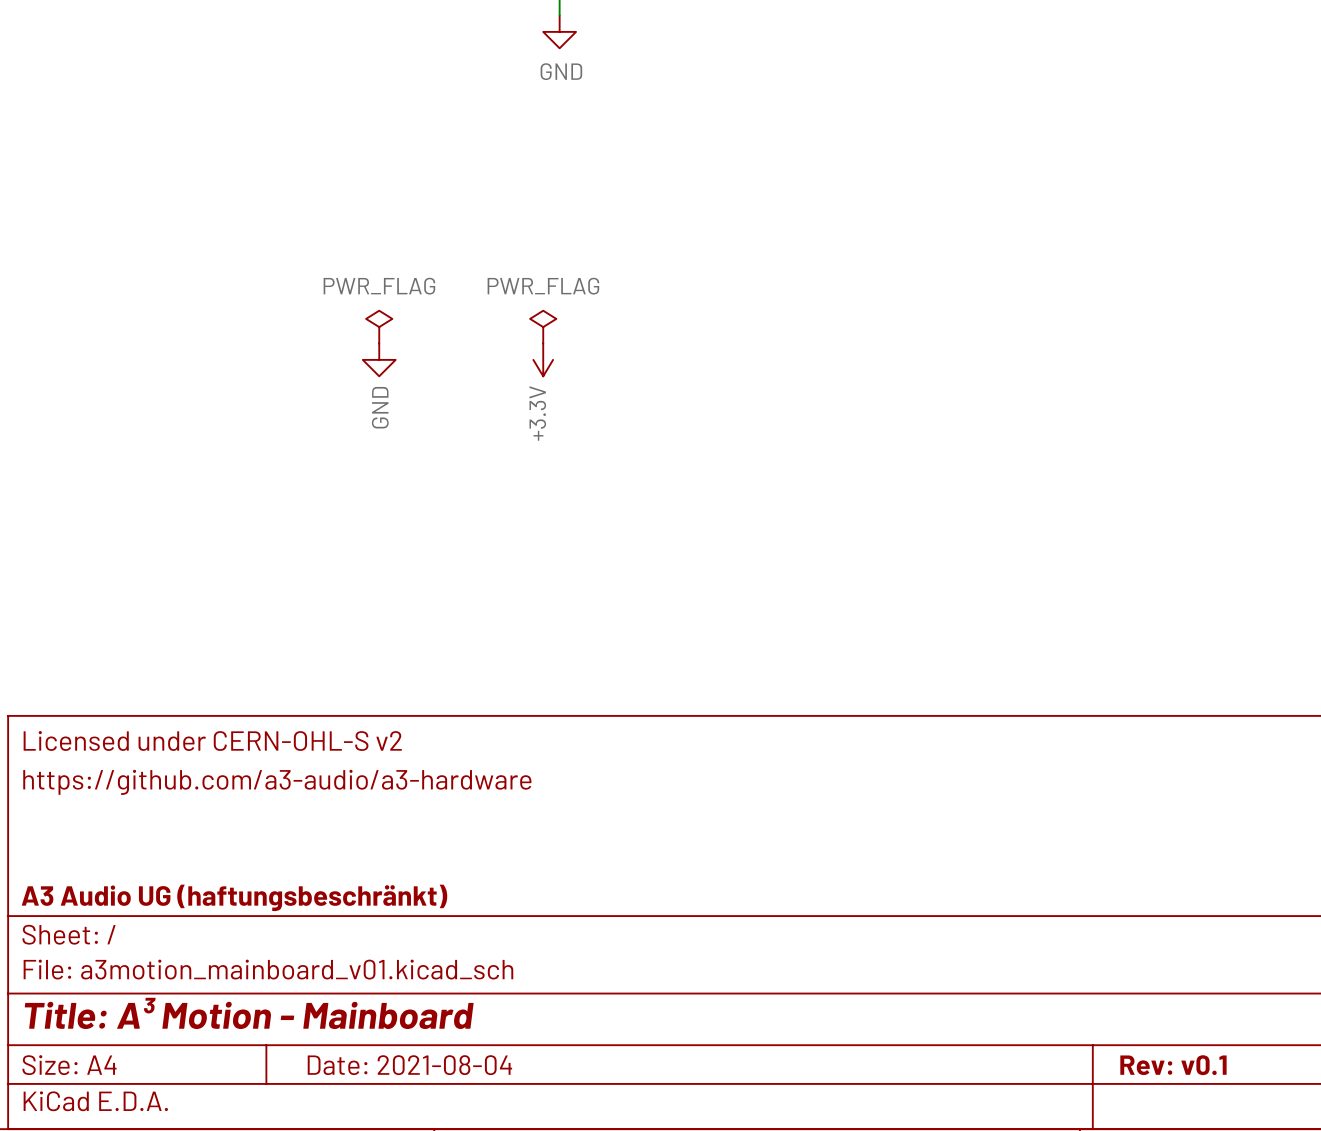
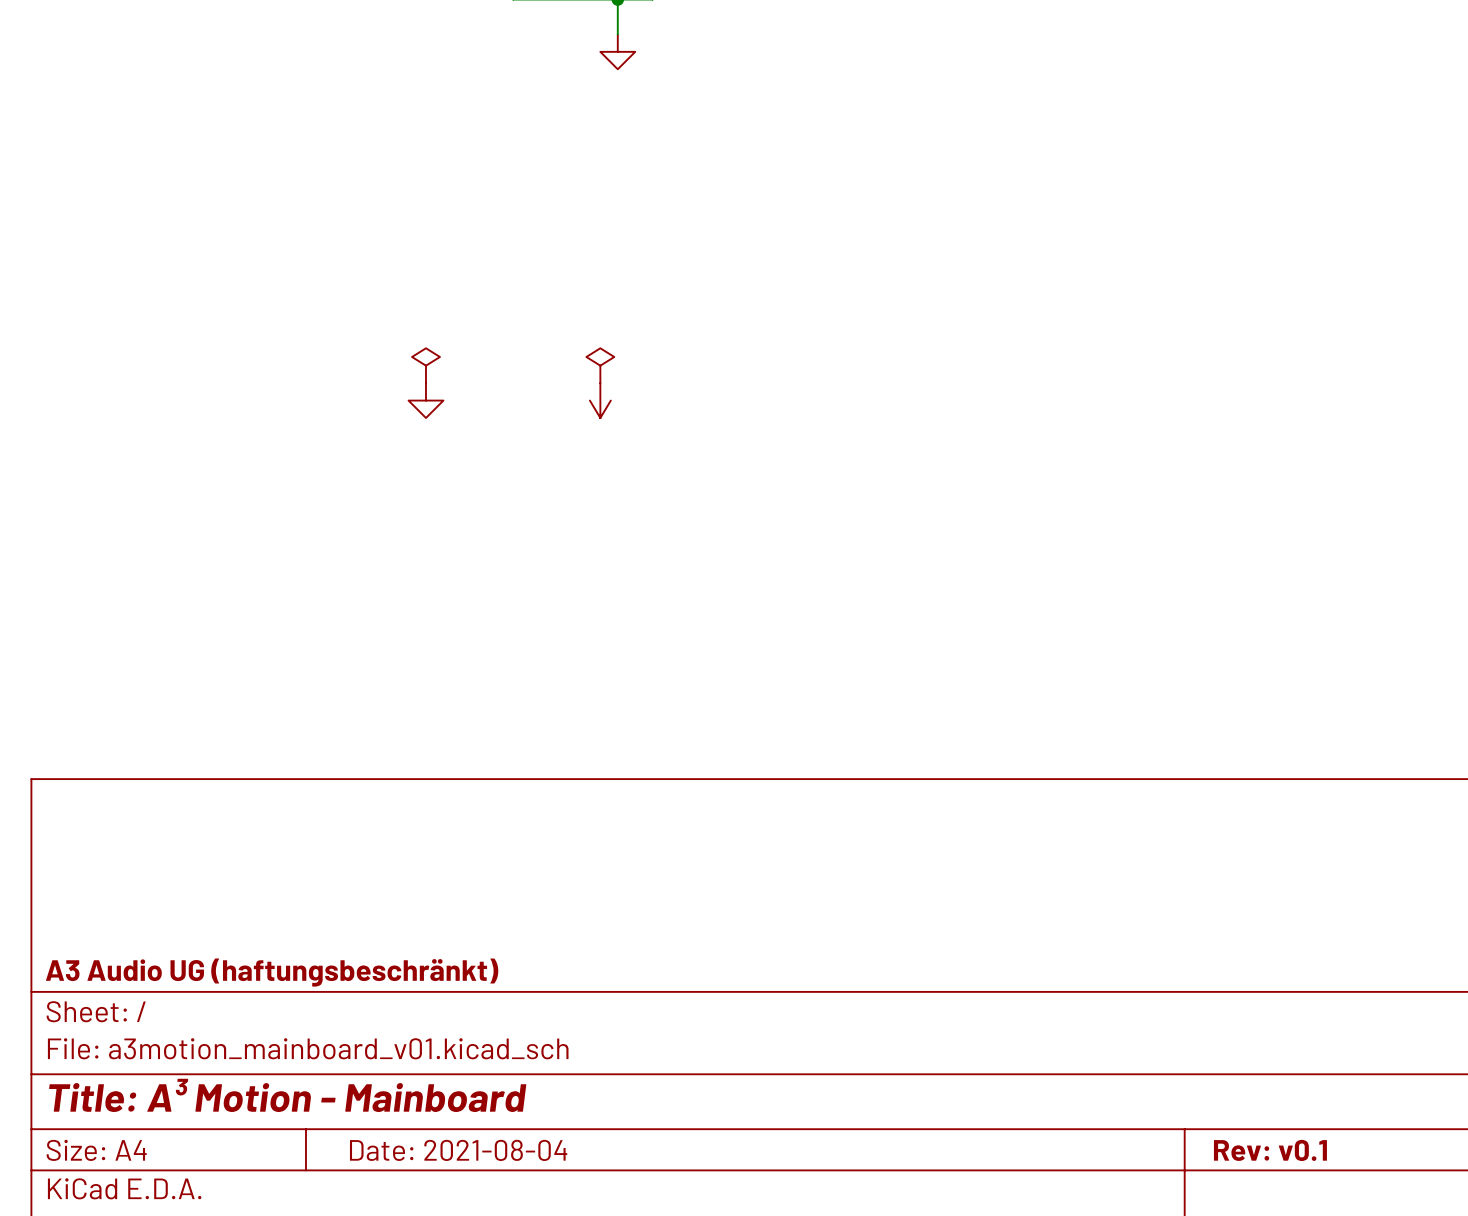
power symbol text: GND (561, 71) -> none
power symbol text: PWR_FLAG (379, 286) -> none
power symbol text: PWR_FLAG (543, 286) -> none
power symbol text: GND (380, 407) -> none
power symbol text: +3.3V (537, 413) -> none
title block: Licensed under CERN-OHL-S v2 (212, 741) -> none
title block: https://github.com/a3-audio/a3-hardware (277, 782) -> none

